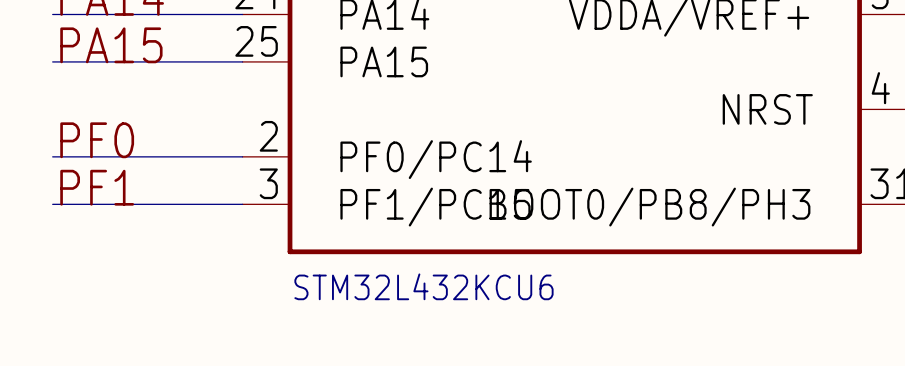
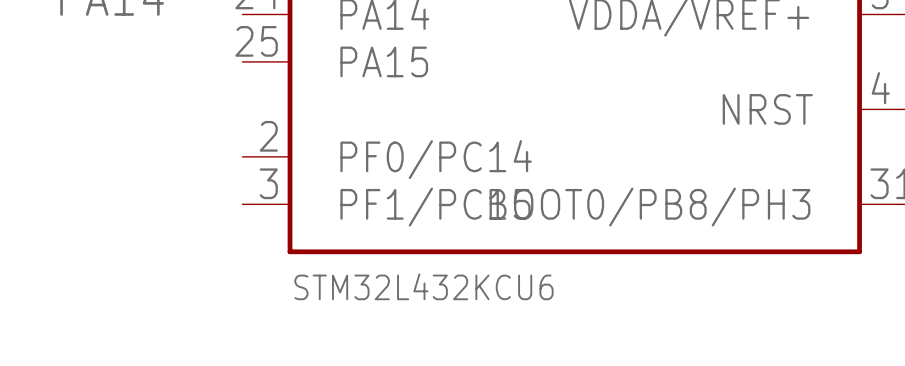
wire: (52, 14) (242, 14) -> none
label: PA15 (111, 45) -> none
wire: (52, 61) (242, 61) -> none
label: PF0 (97, 140) -> none
wire: (52, 156) (242, 156) -> none
label: PF1 (97, 187) -> none
wire: (52, 204) (242, 204) -> none

